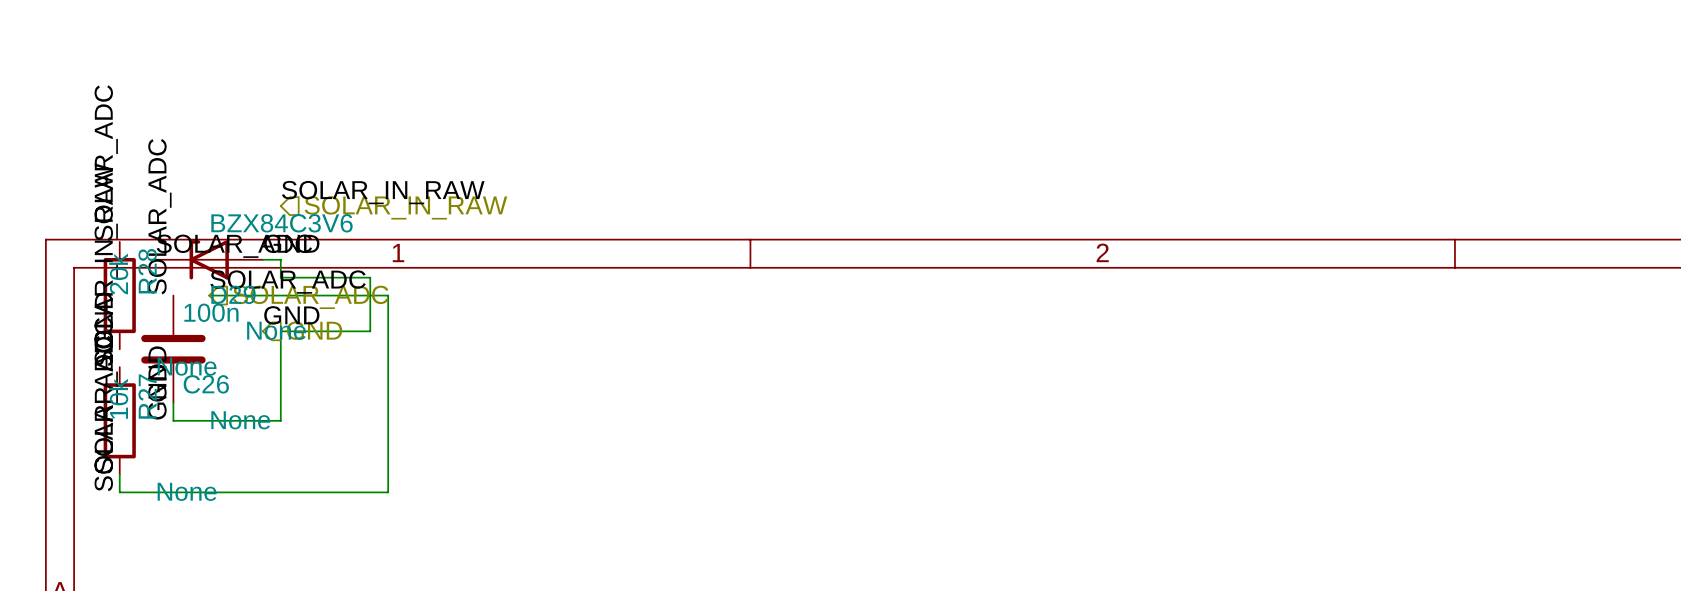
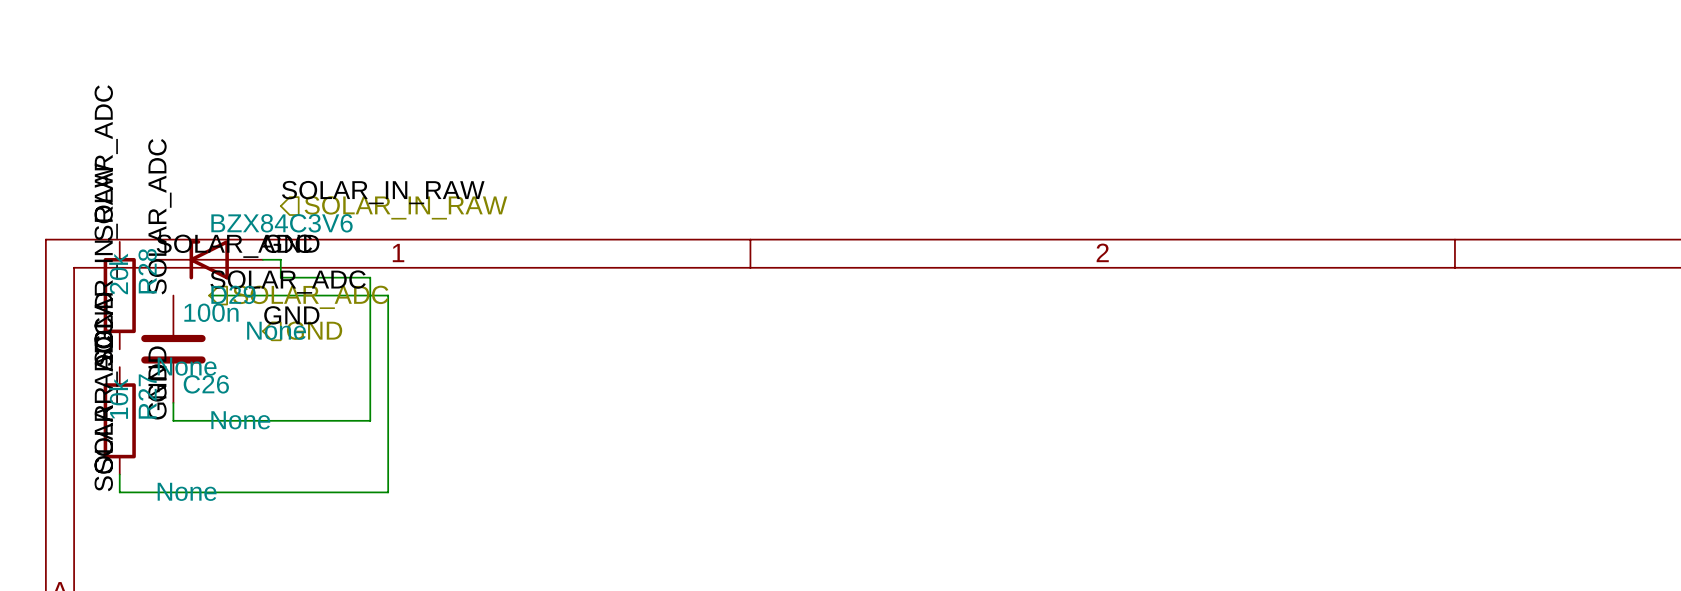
wire: (370, 331) (280, 331) (280, 420) -> (370, 331) (370, 420) (280, 420)

